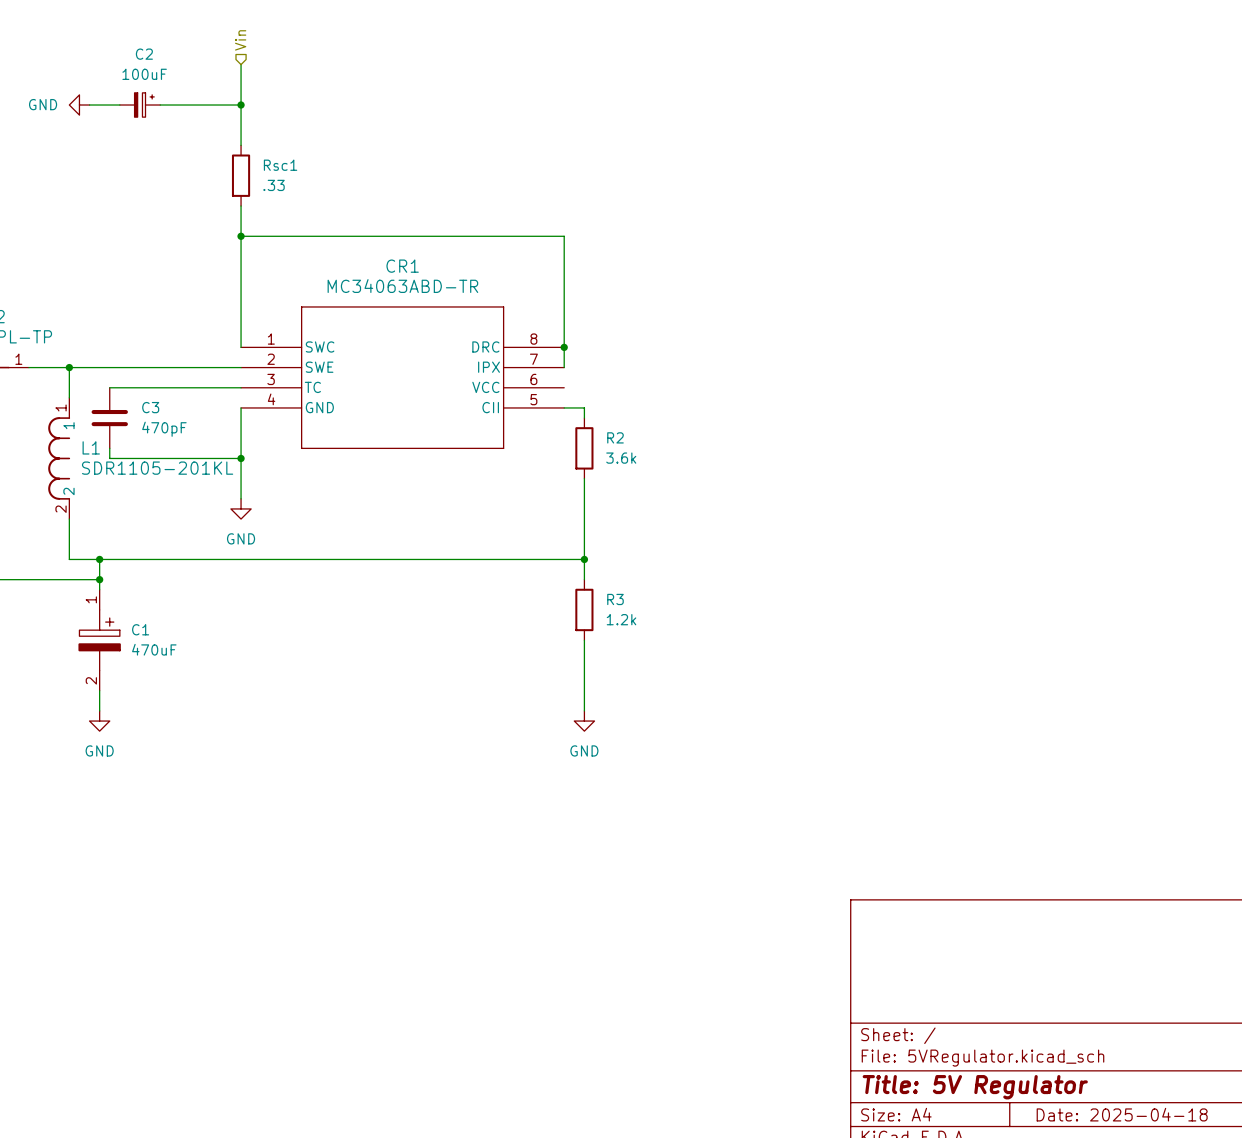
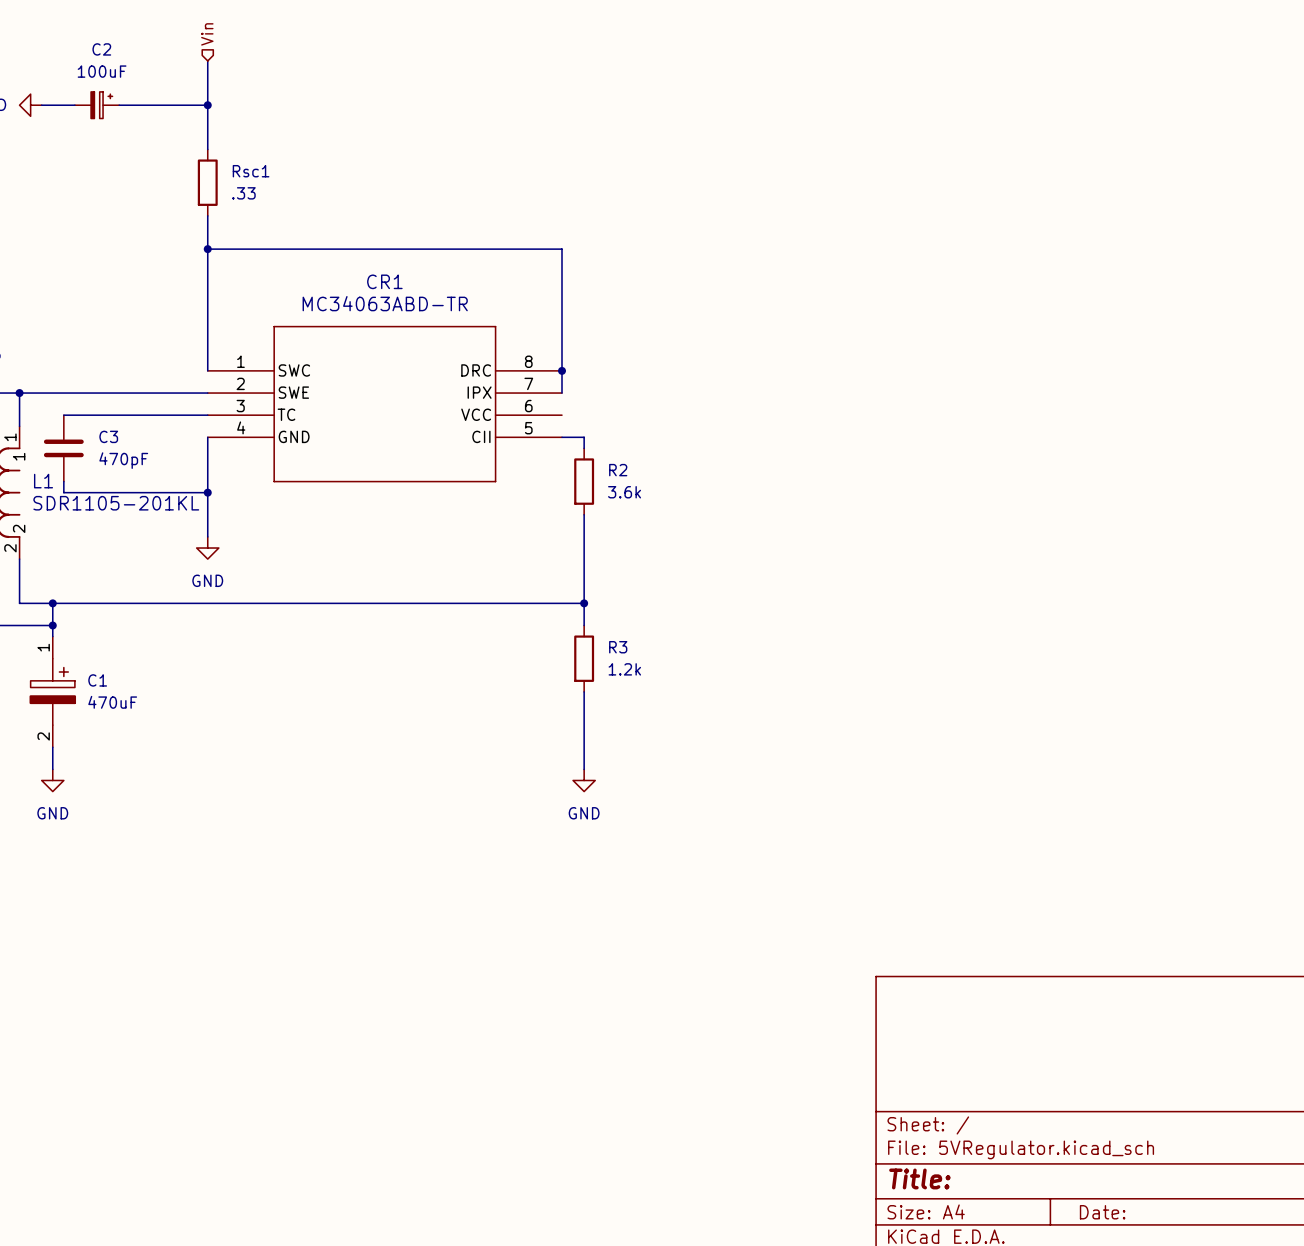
title block: Title: 5V Regulator (975, 1087) -> Title: (919, 1178)
title block: Date: 2025-04-18 (1122, 1114) -> Date: (1102, 1212)

